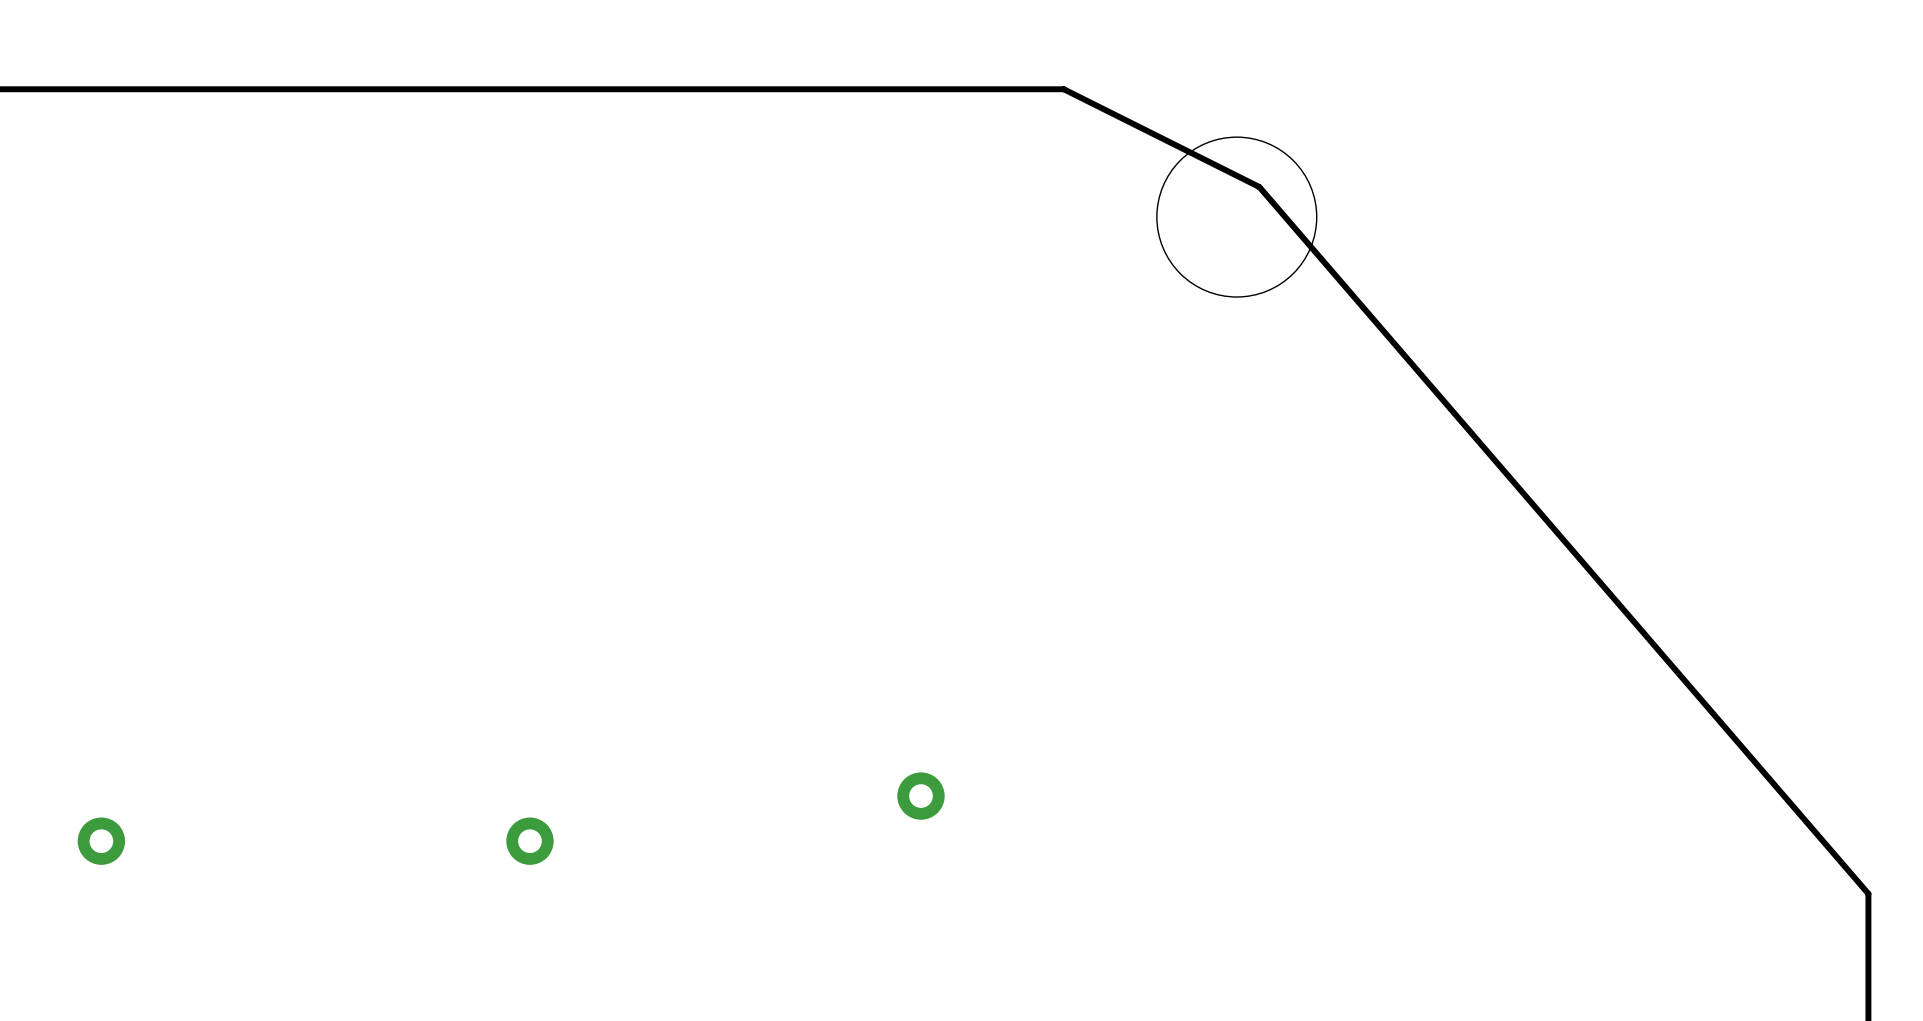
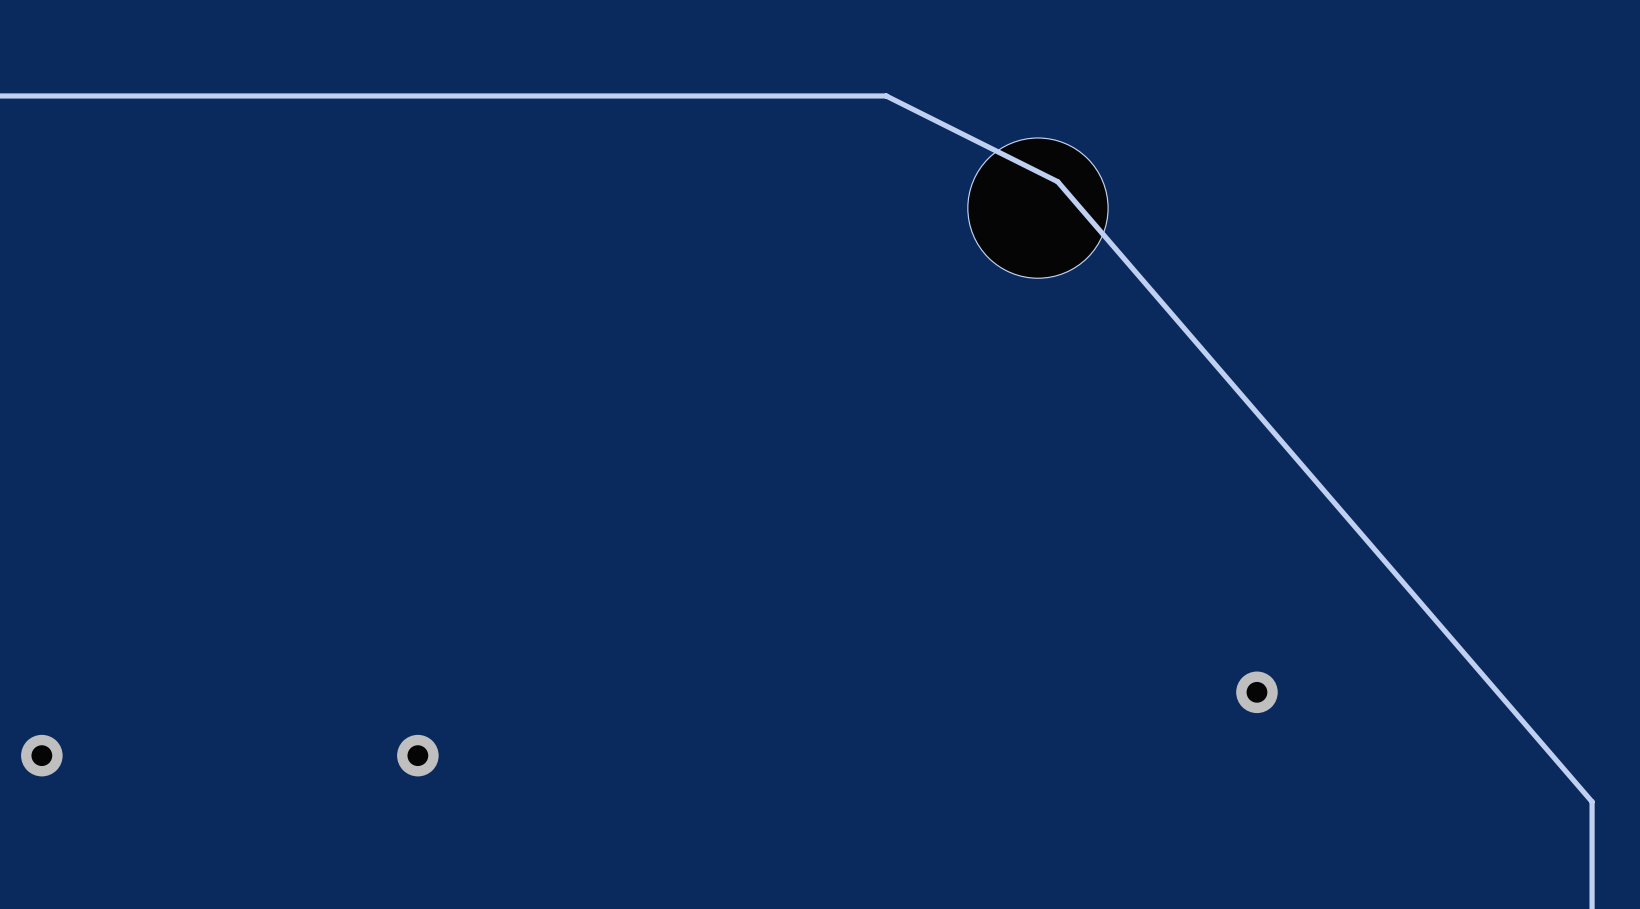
via: none -> (1256, 692)
via: (920, 796) -> none

